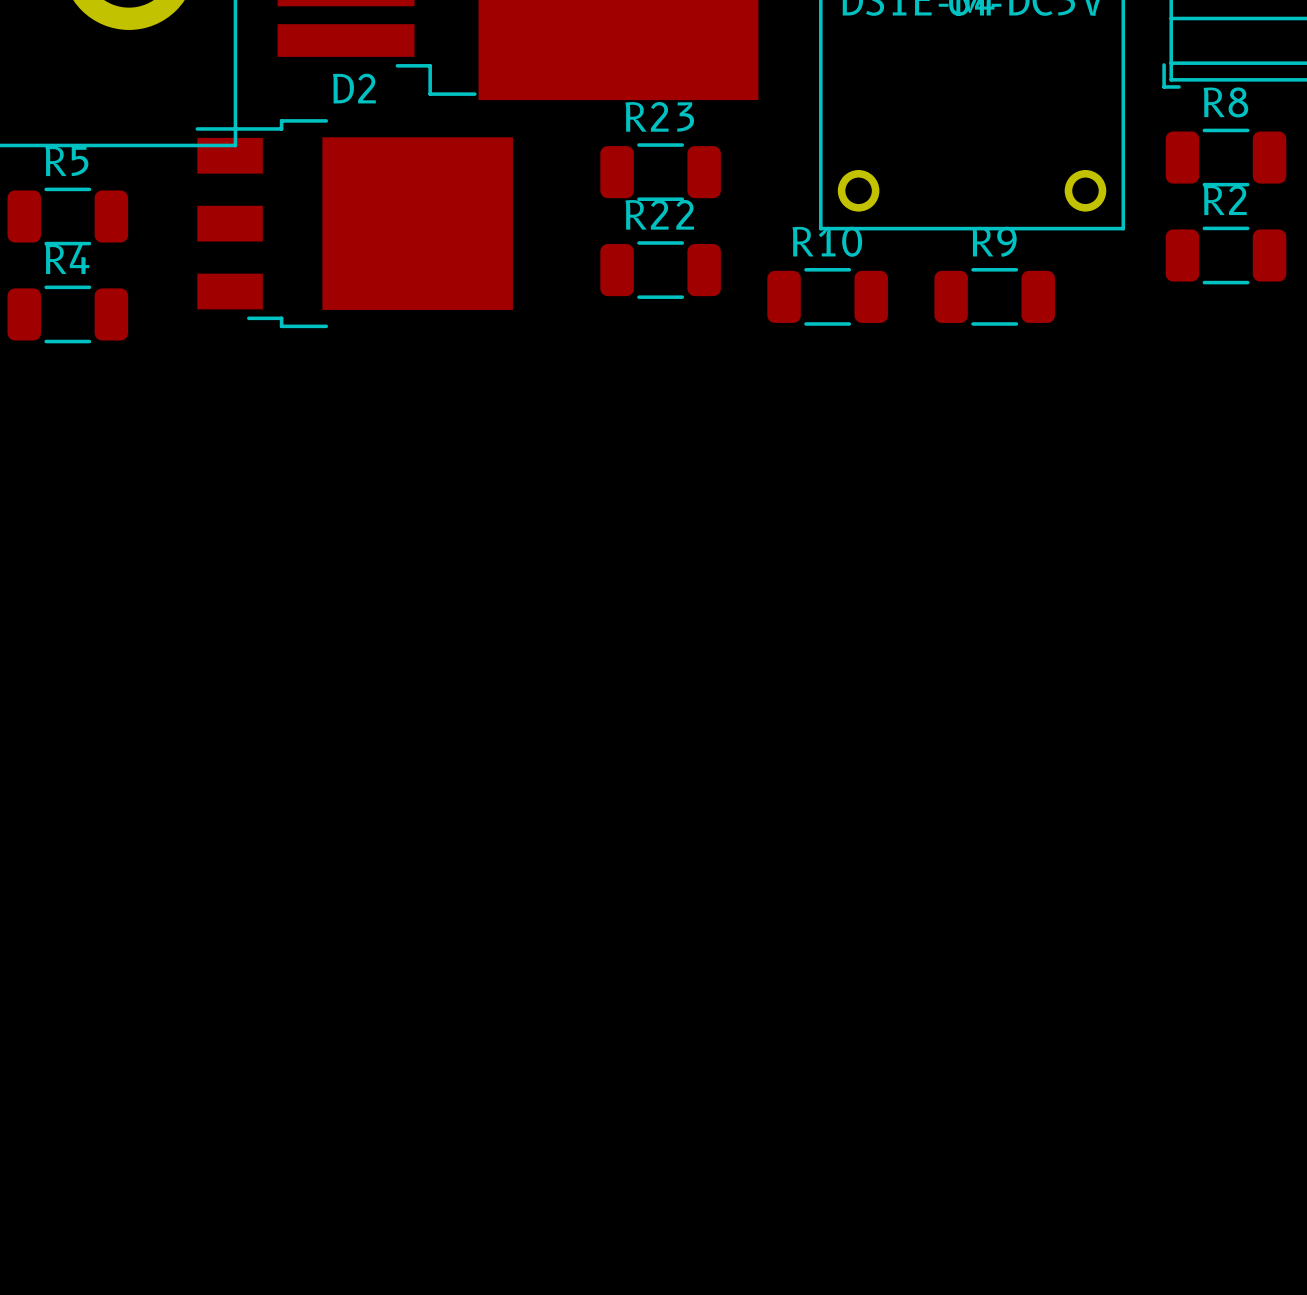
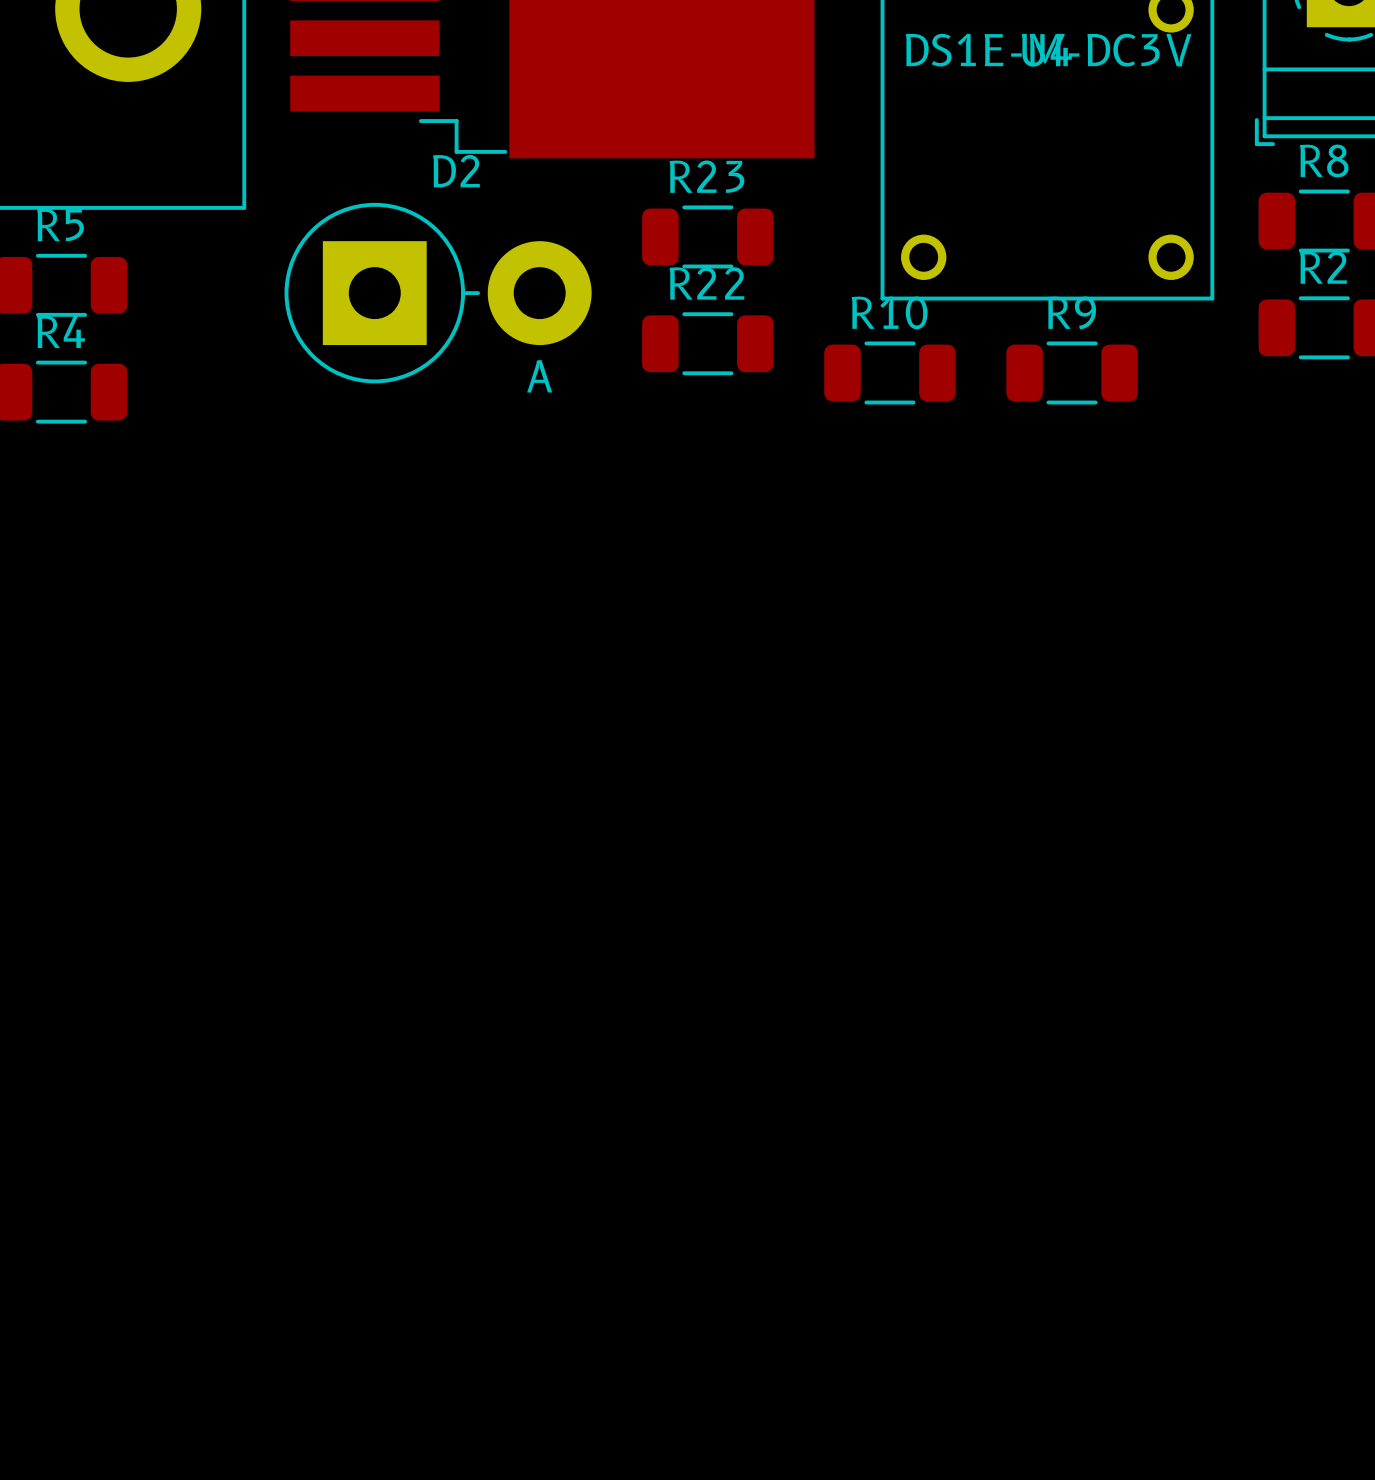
D2 footprint: [195, 119, 513, 329] -> [284, 202, 592, 384]

